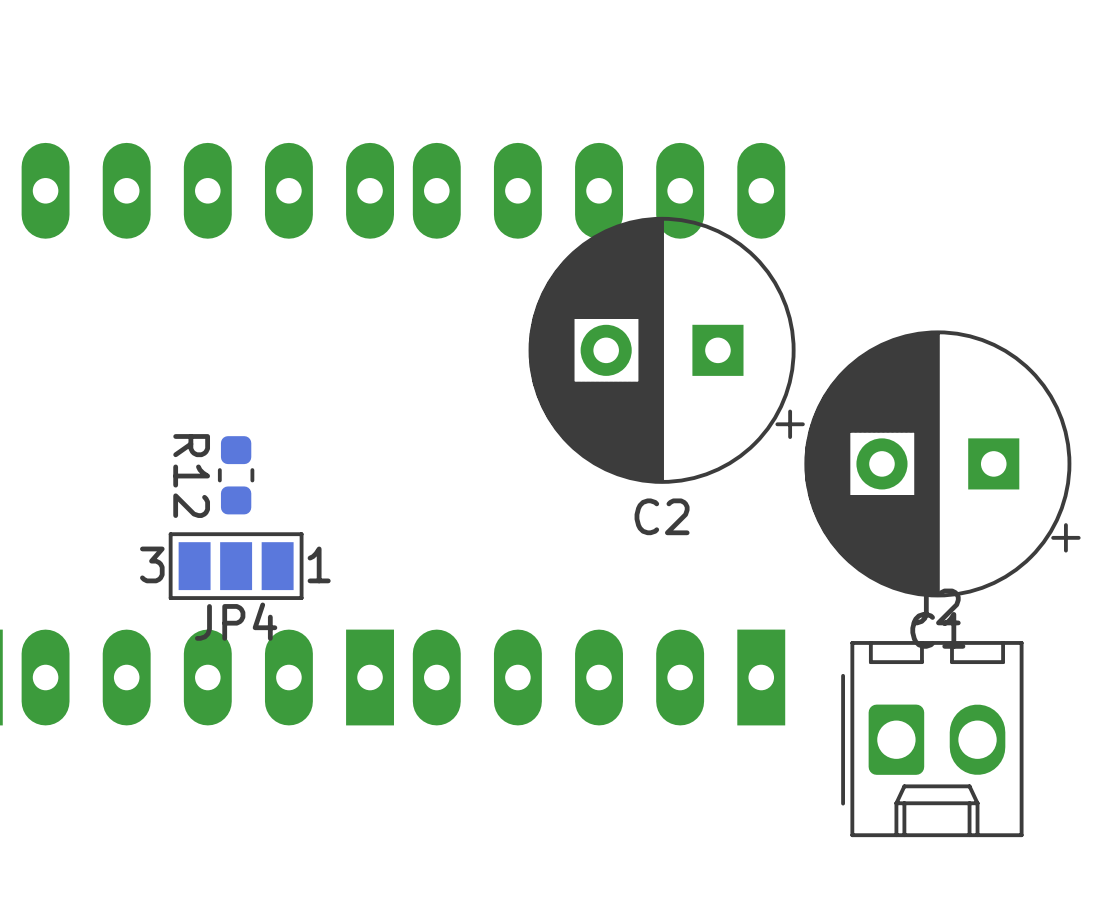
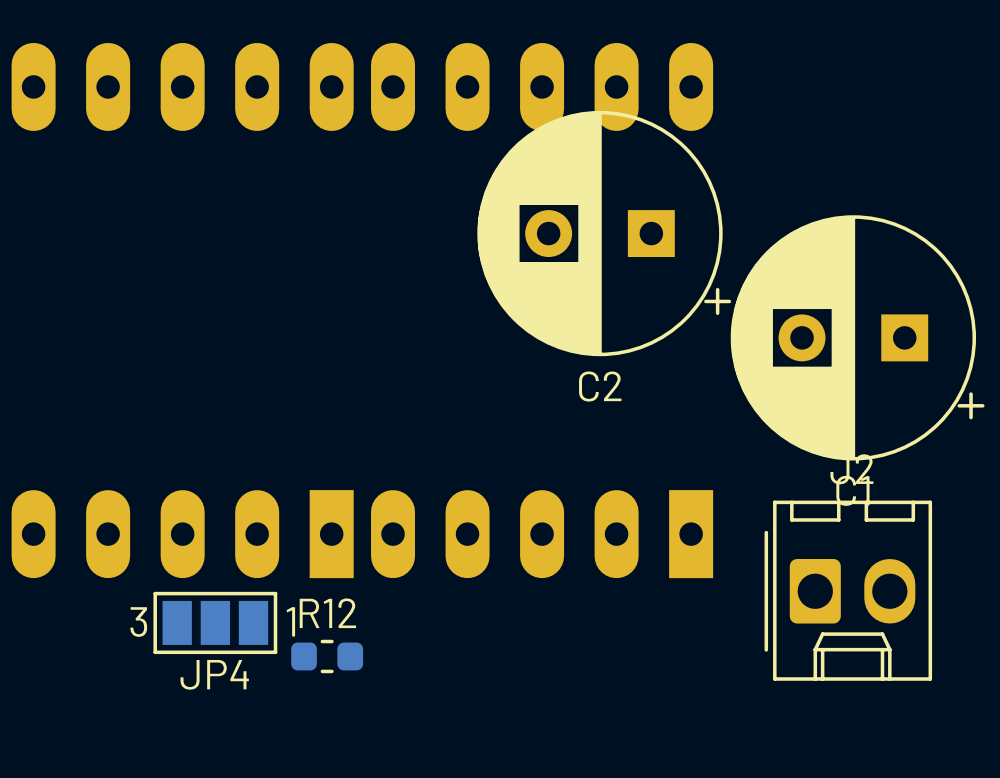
R12 rotation: 0° (236, 475) -> 90° clockwise (327, 656)
R12 position: (236, 475) -> (327, 656)
JP4 position: (236, 566) -> (215, 622)

